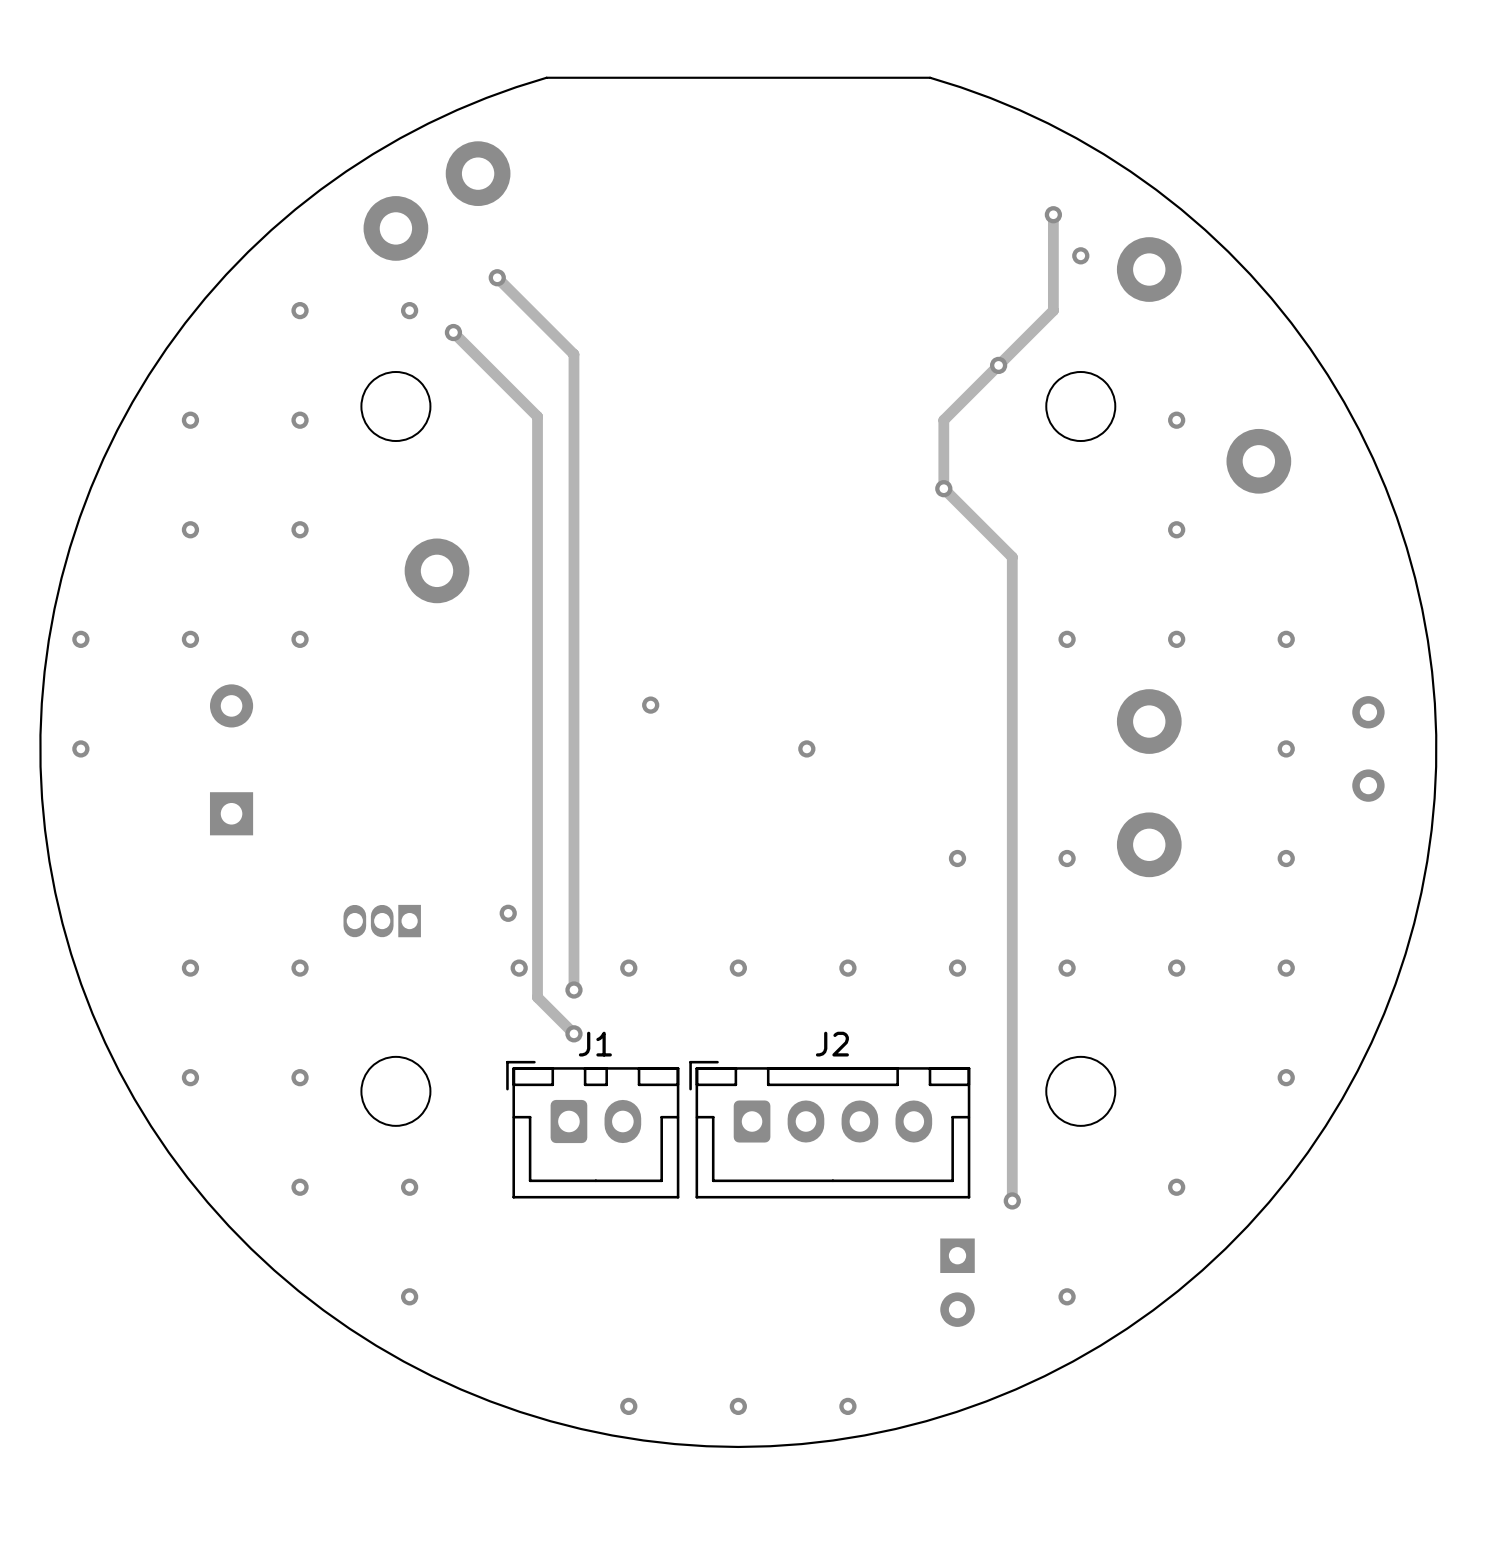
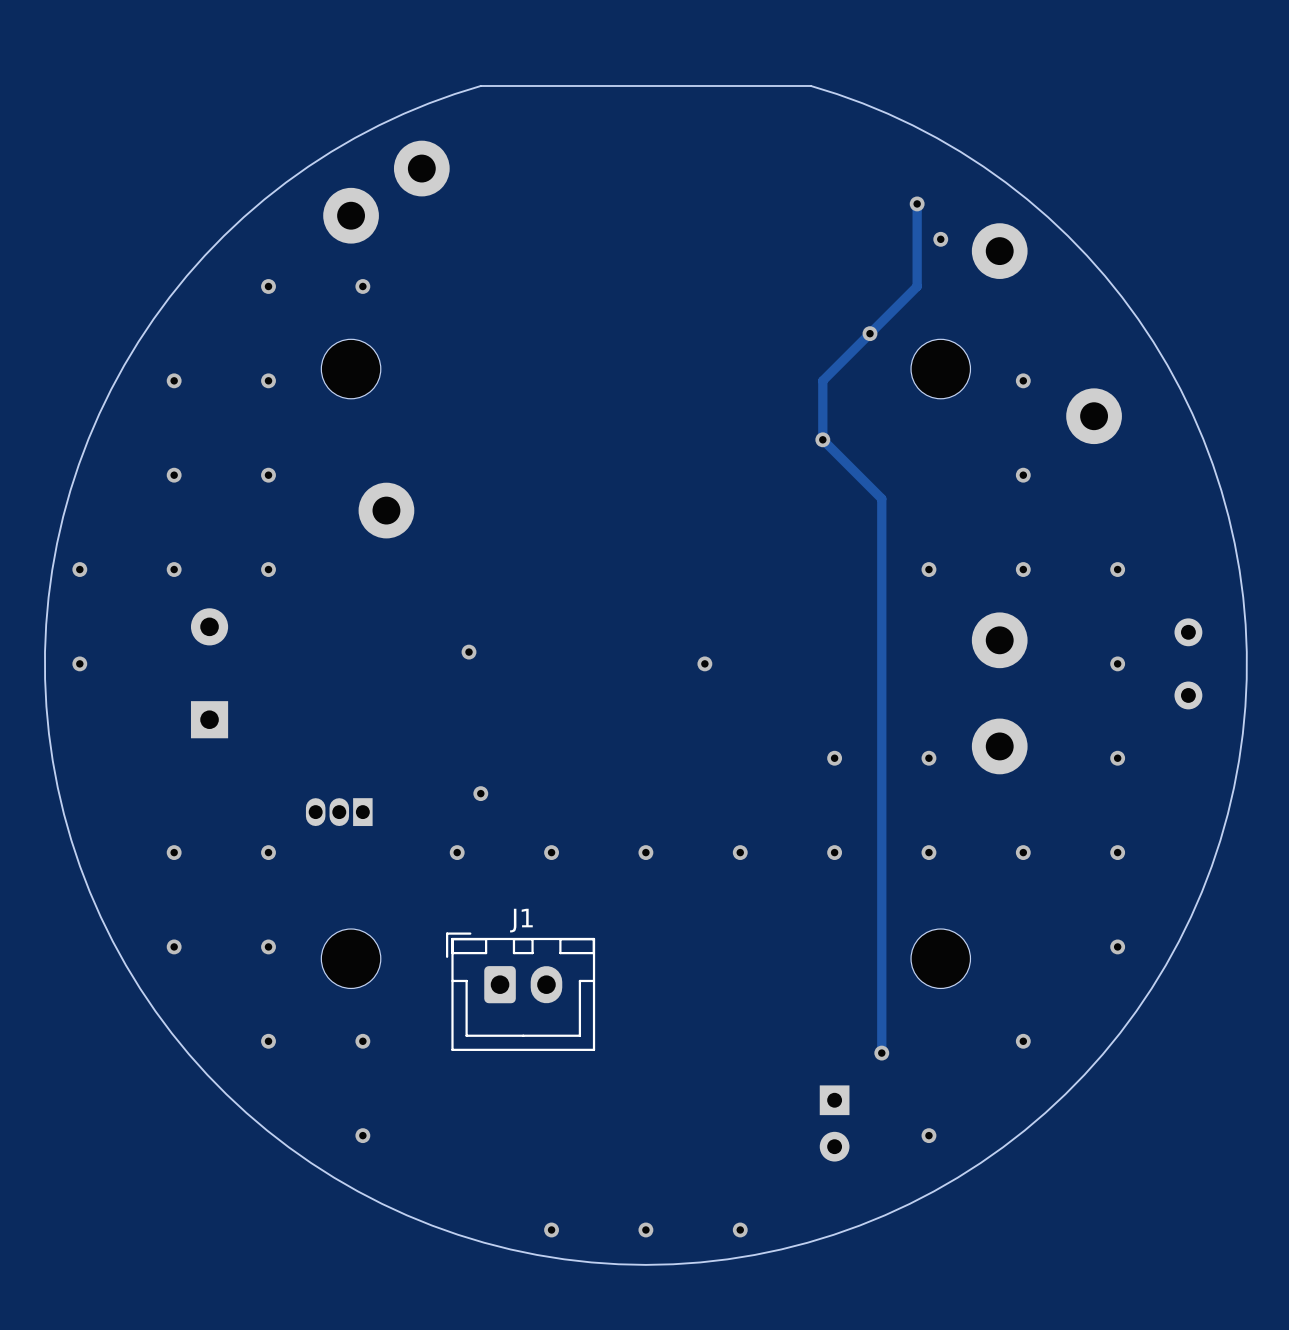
track: (497, 277) (573, 354) (573, 990) -> none
via: (497, 277) -> none
track: (453, 332) (537, 416) (537, 997) (573, 1033) -> none
via: (453, 332) -> none
via: (650, 705) -> none
via: none -> (469, 652)
via position: (508, 913) -> (480, 793)
via: (573, 990) -> none
via: (573, 1033) -> none
J2: (829, 1129) -> none

